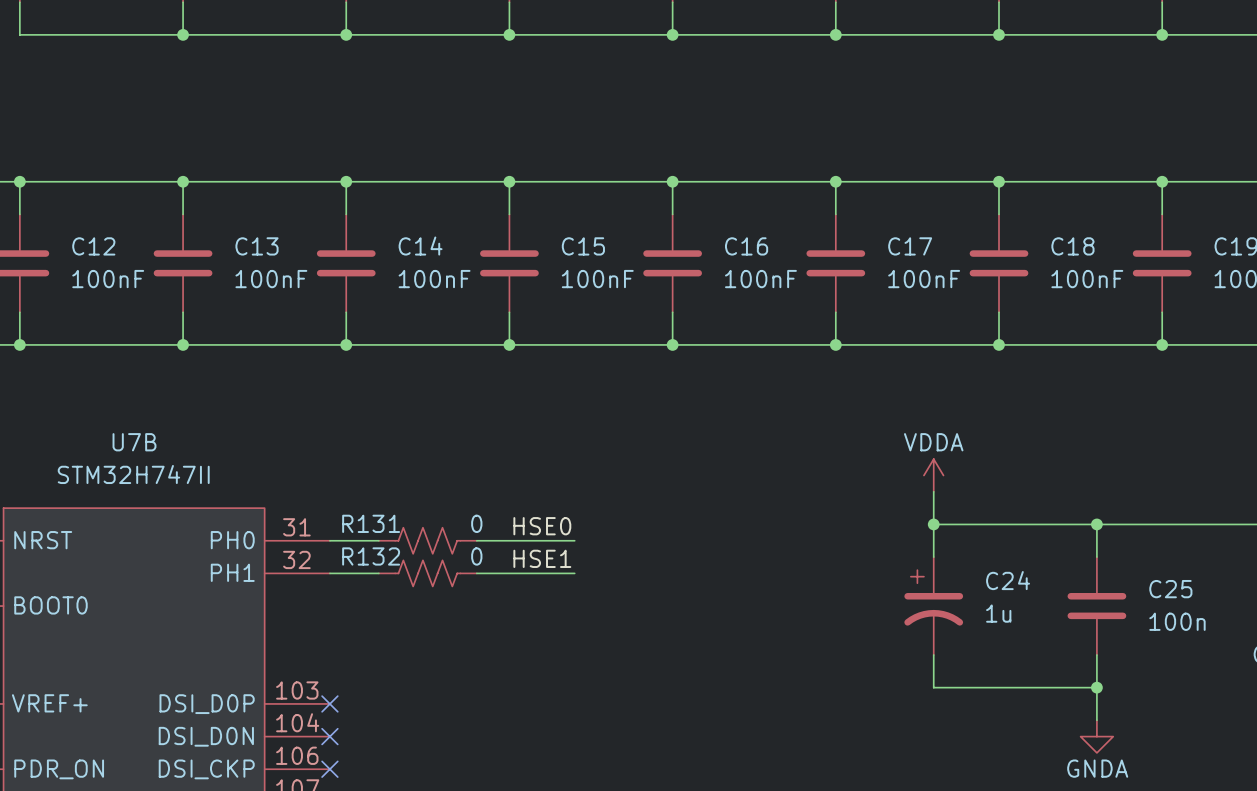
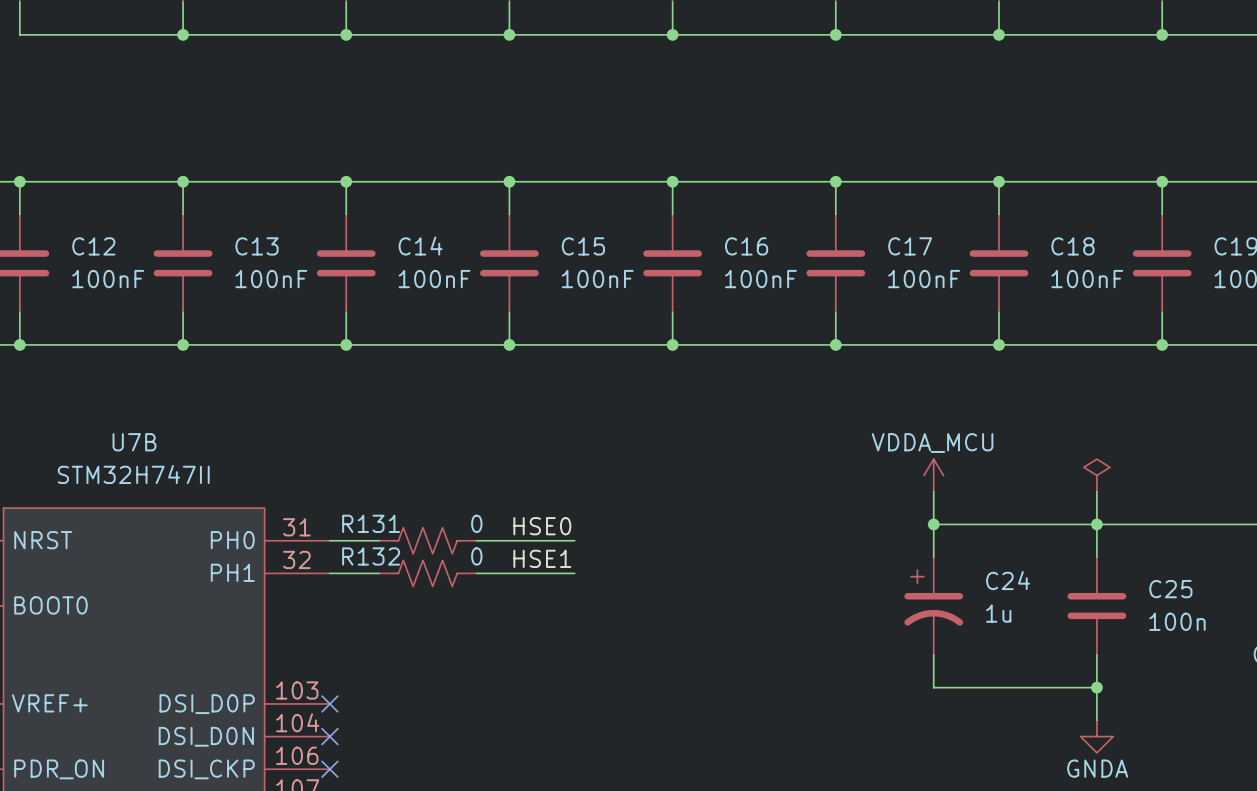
power symbol: VDDA (933, 475) -> VDDA_MCU (933, 475)
power symbol: none -> (1096, 475)
wire: none -> (1096, 491) (1096, 524)

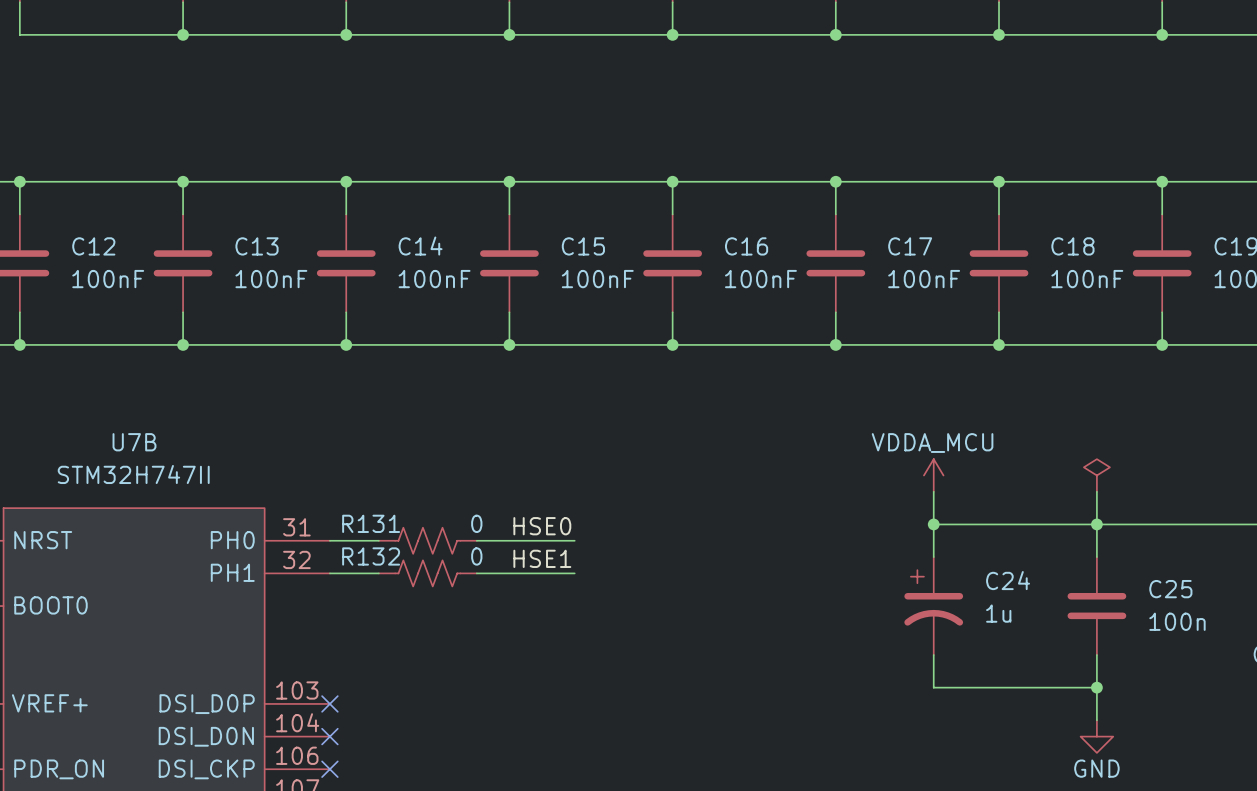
power symbol: GNDA (1096, 736) -> GND (1096, 736)

